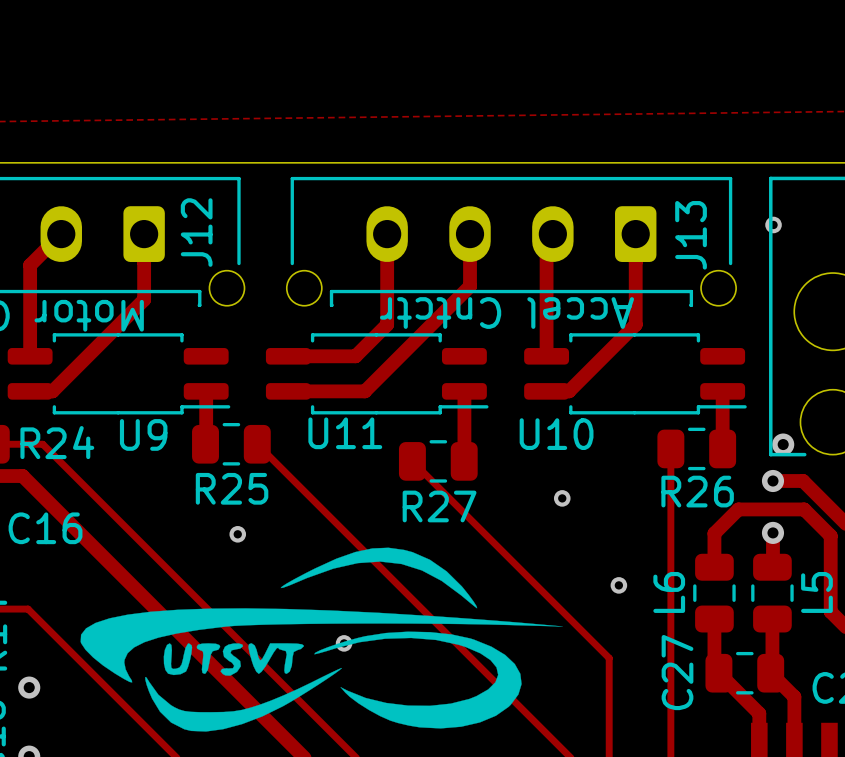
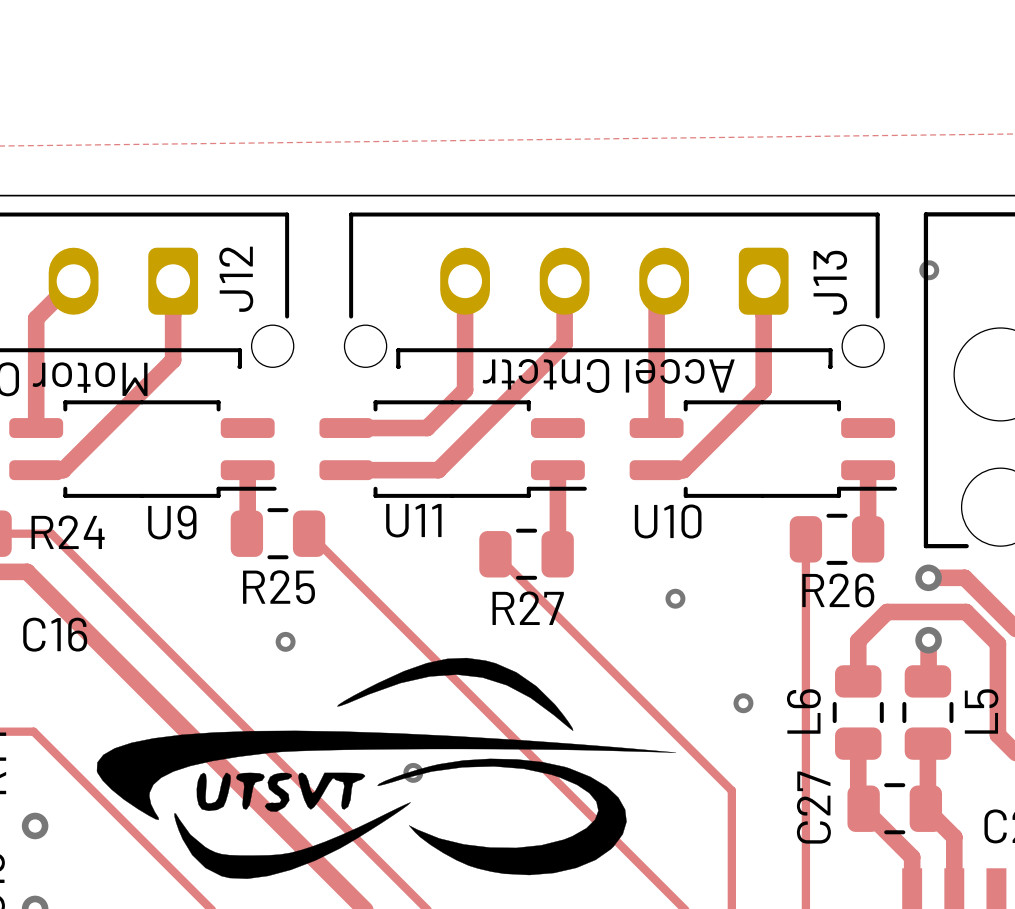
via: (783, 444) -> none

